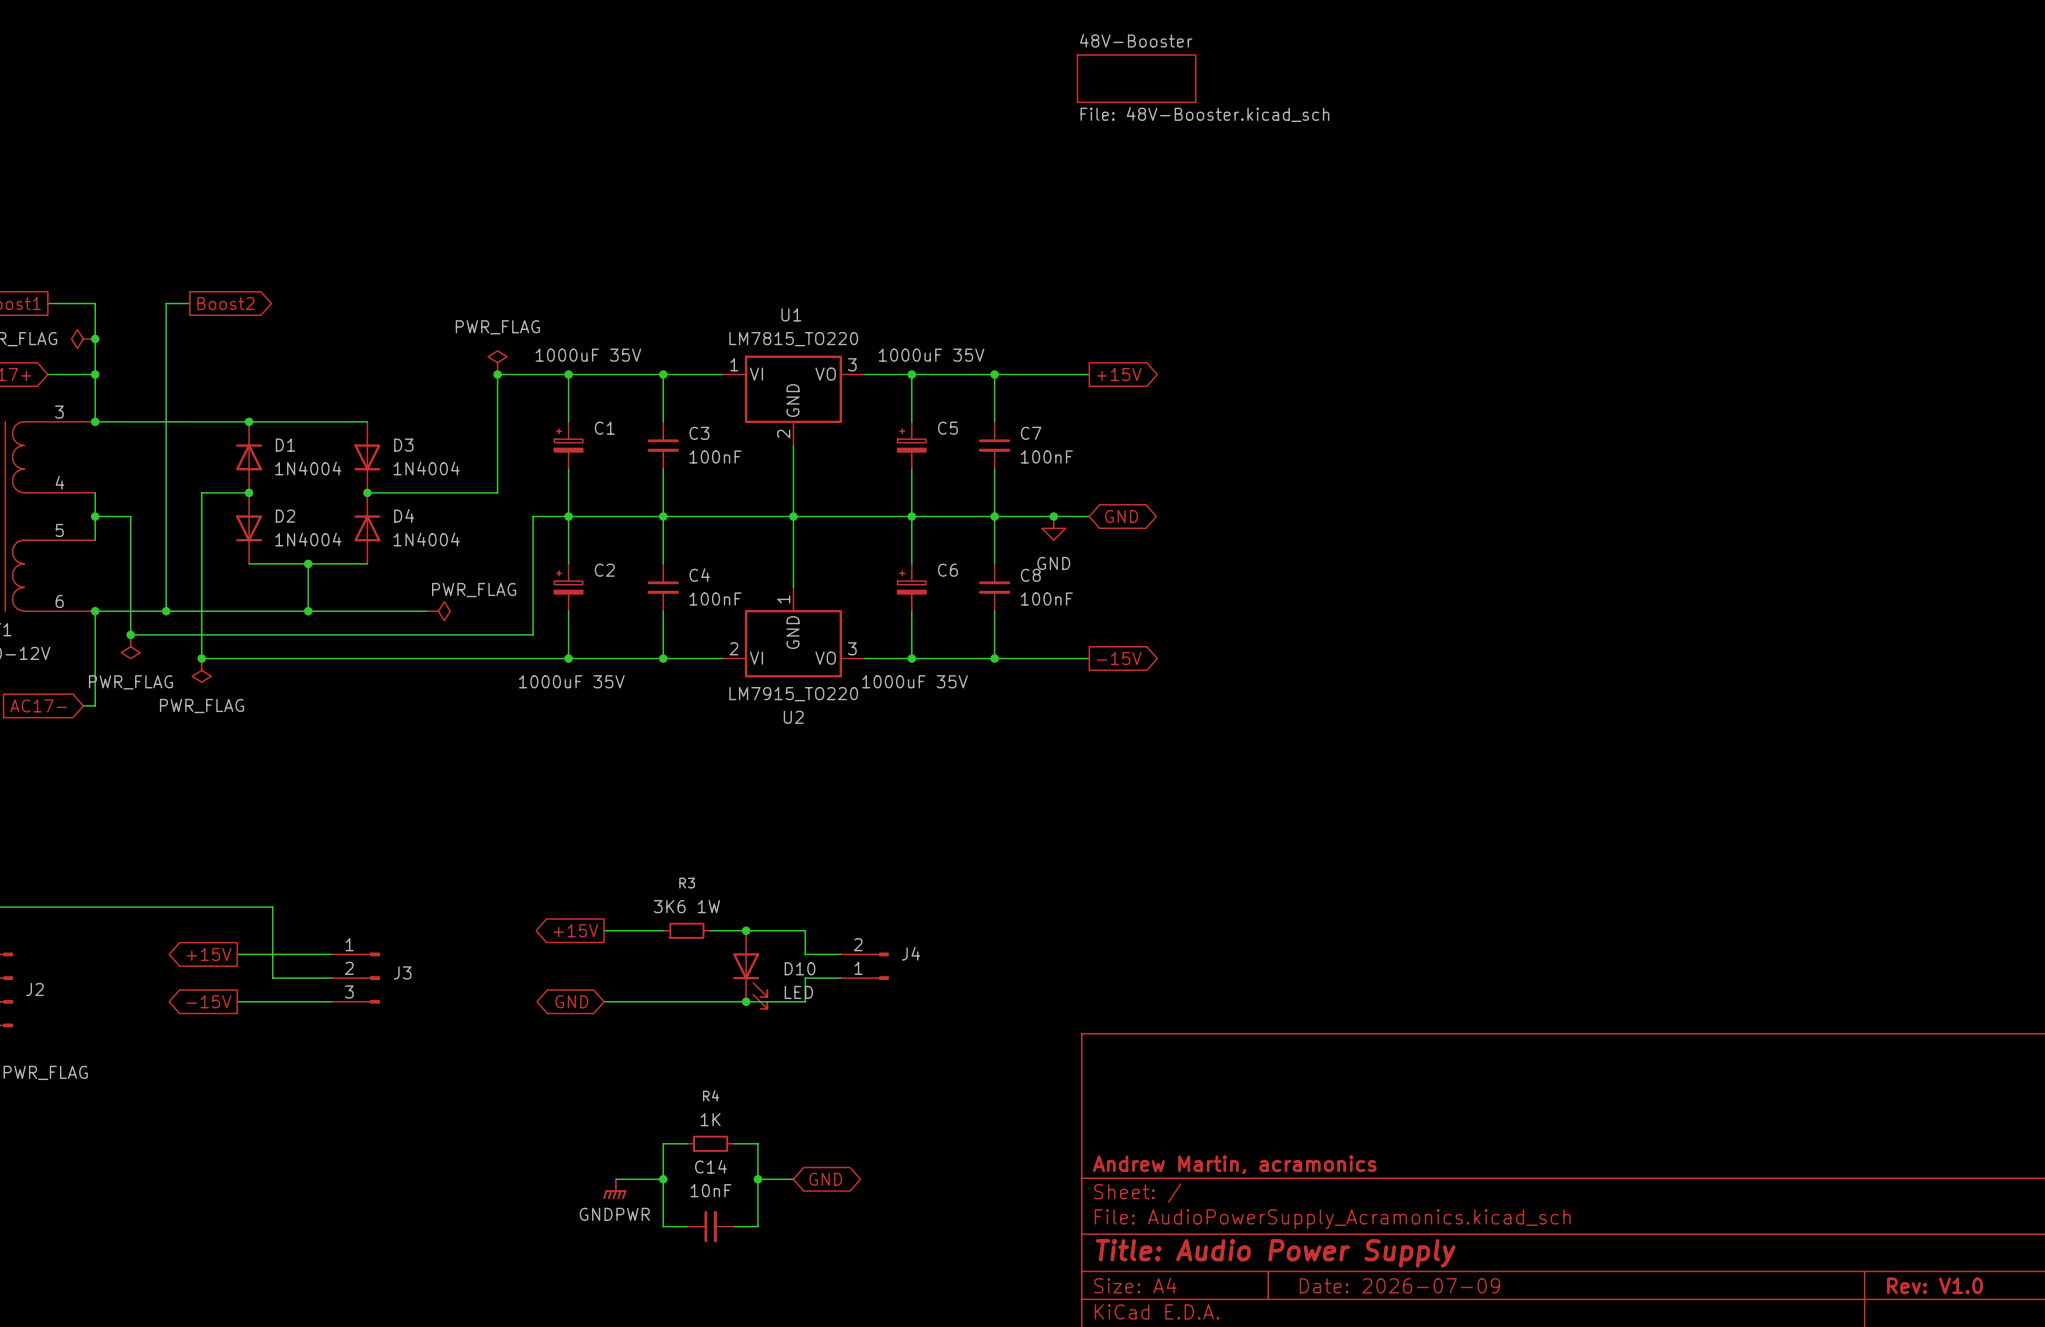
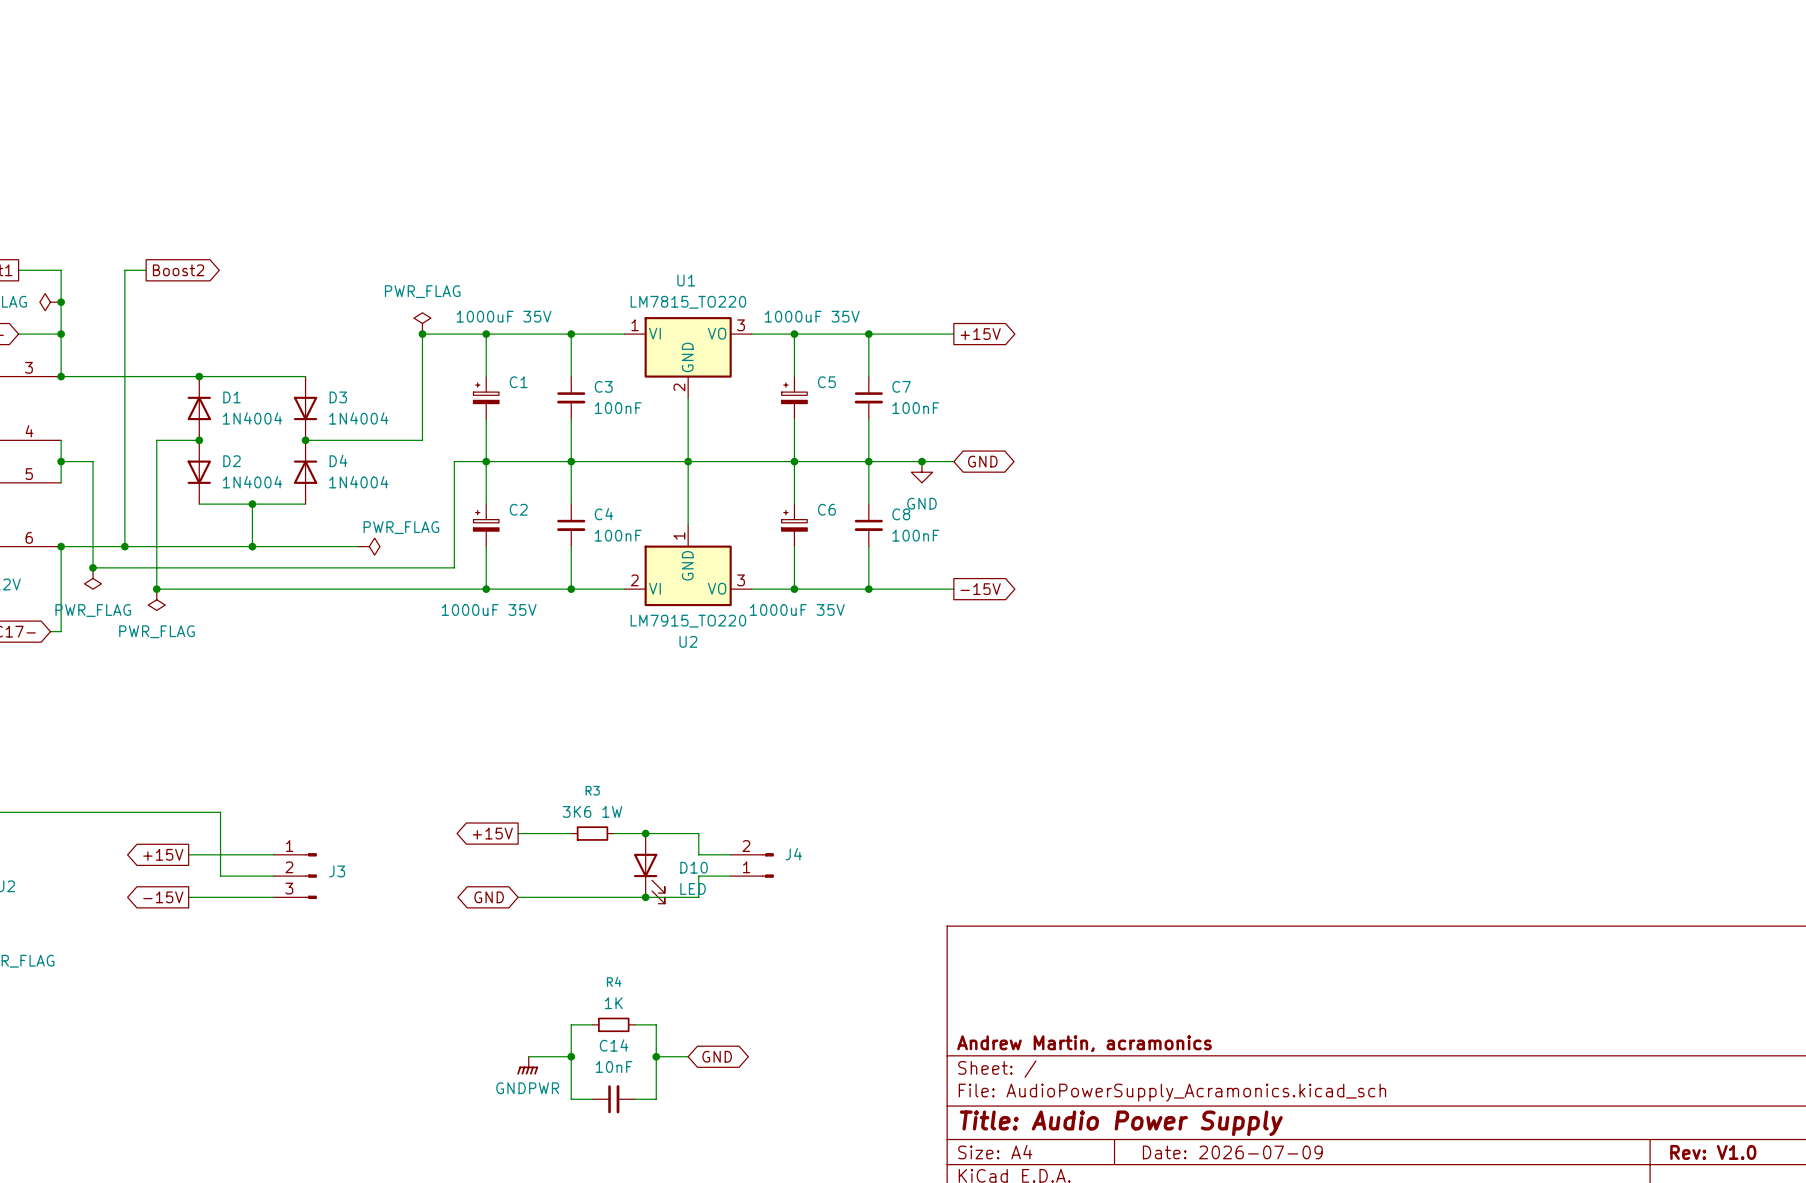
sheet 48V-Booster: File: 48V-Booster.kicad_sch (1136, 78) -> none

